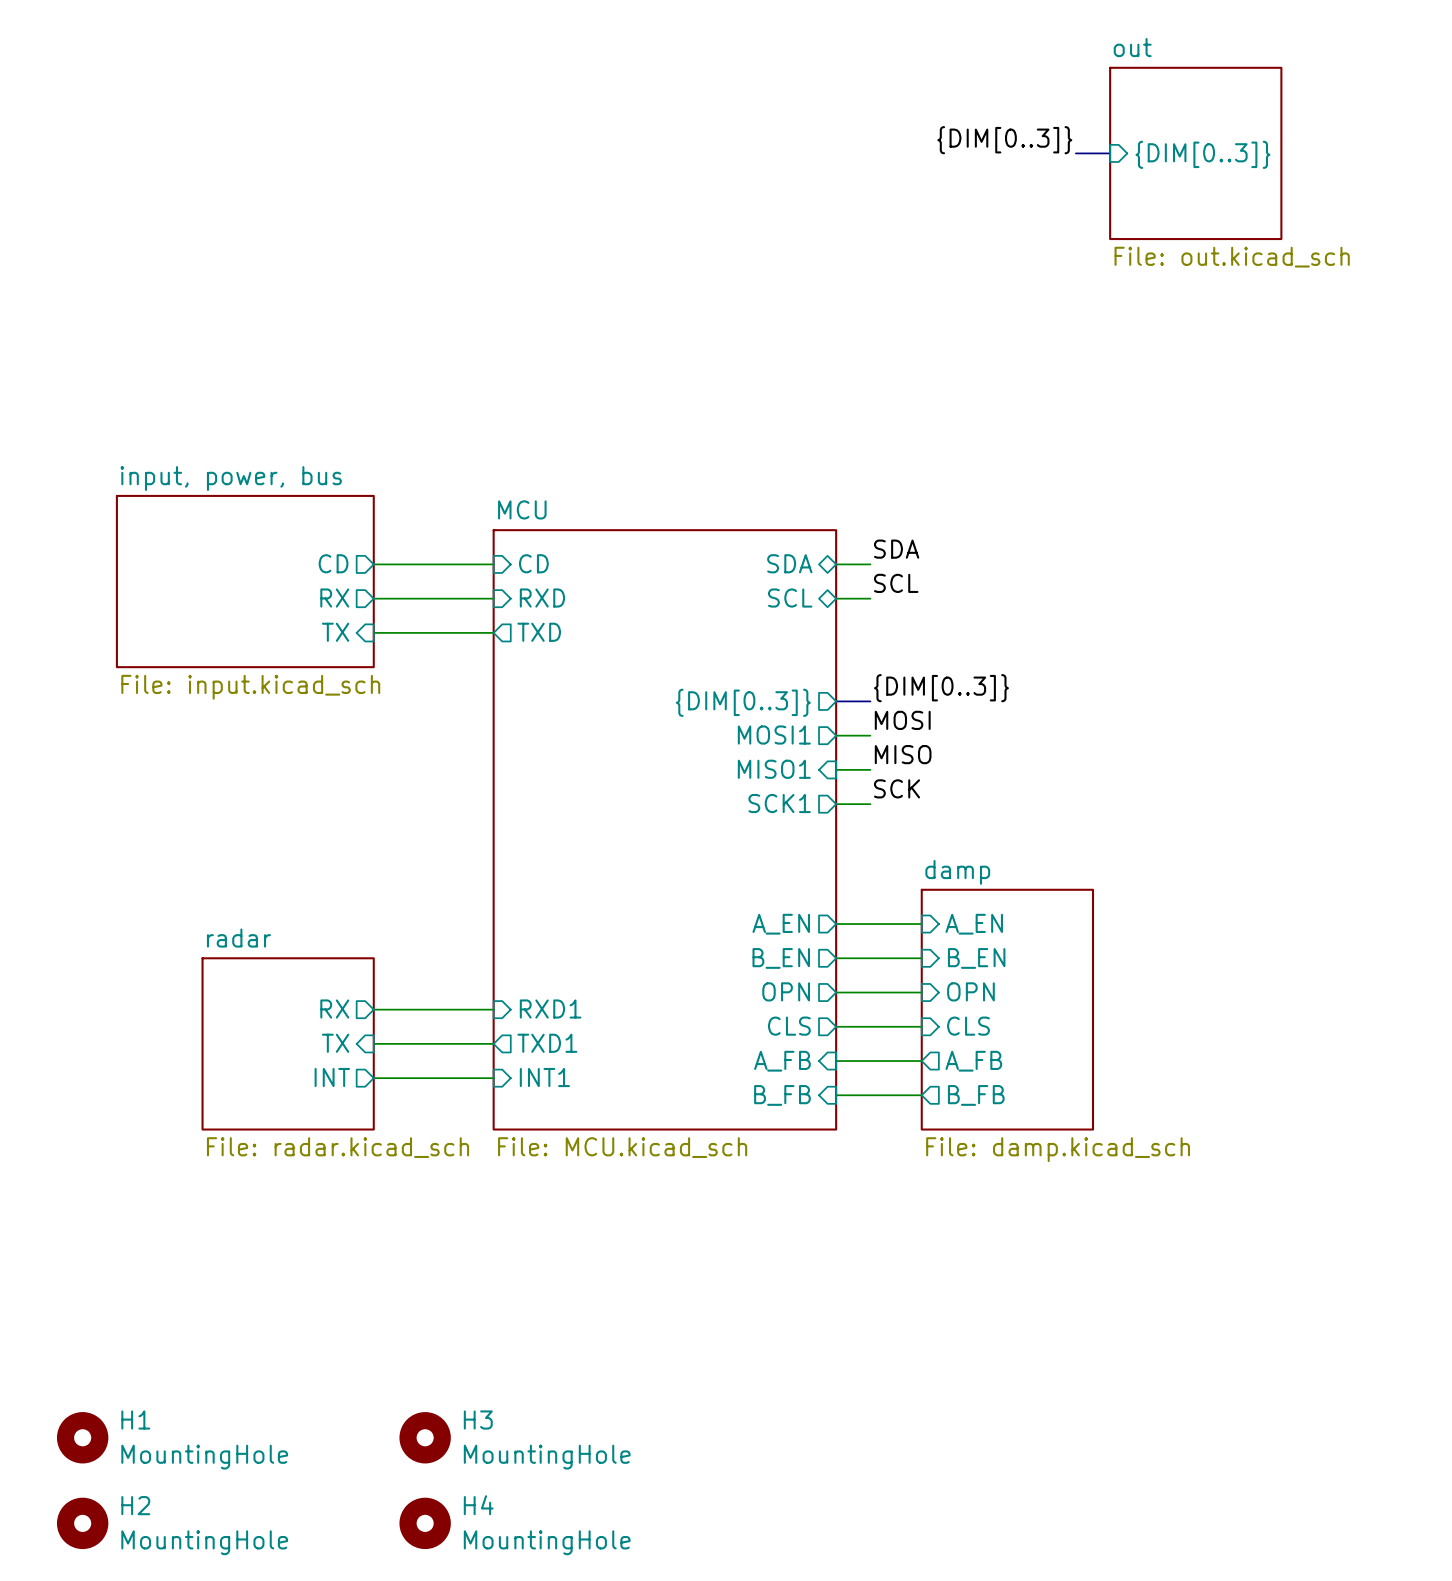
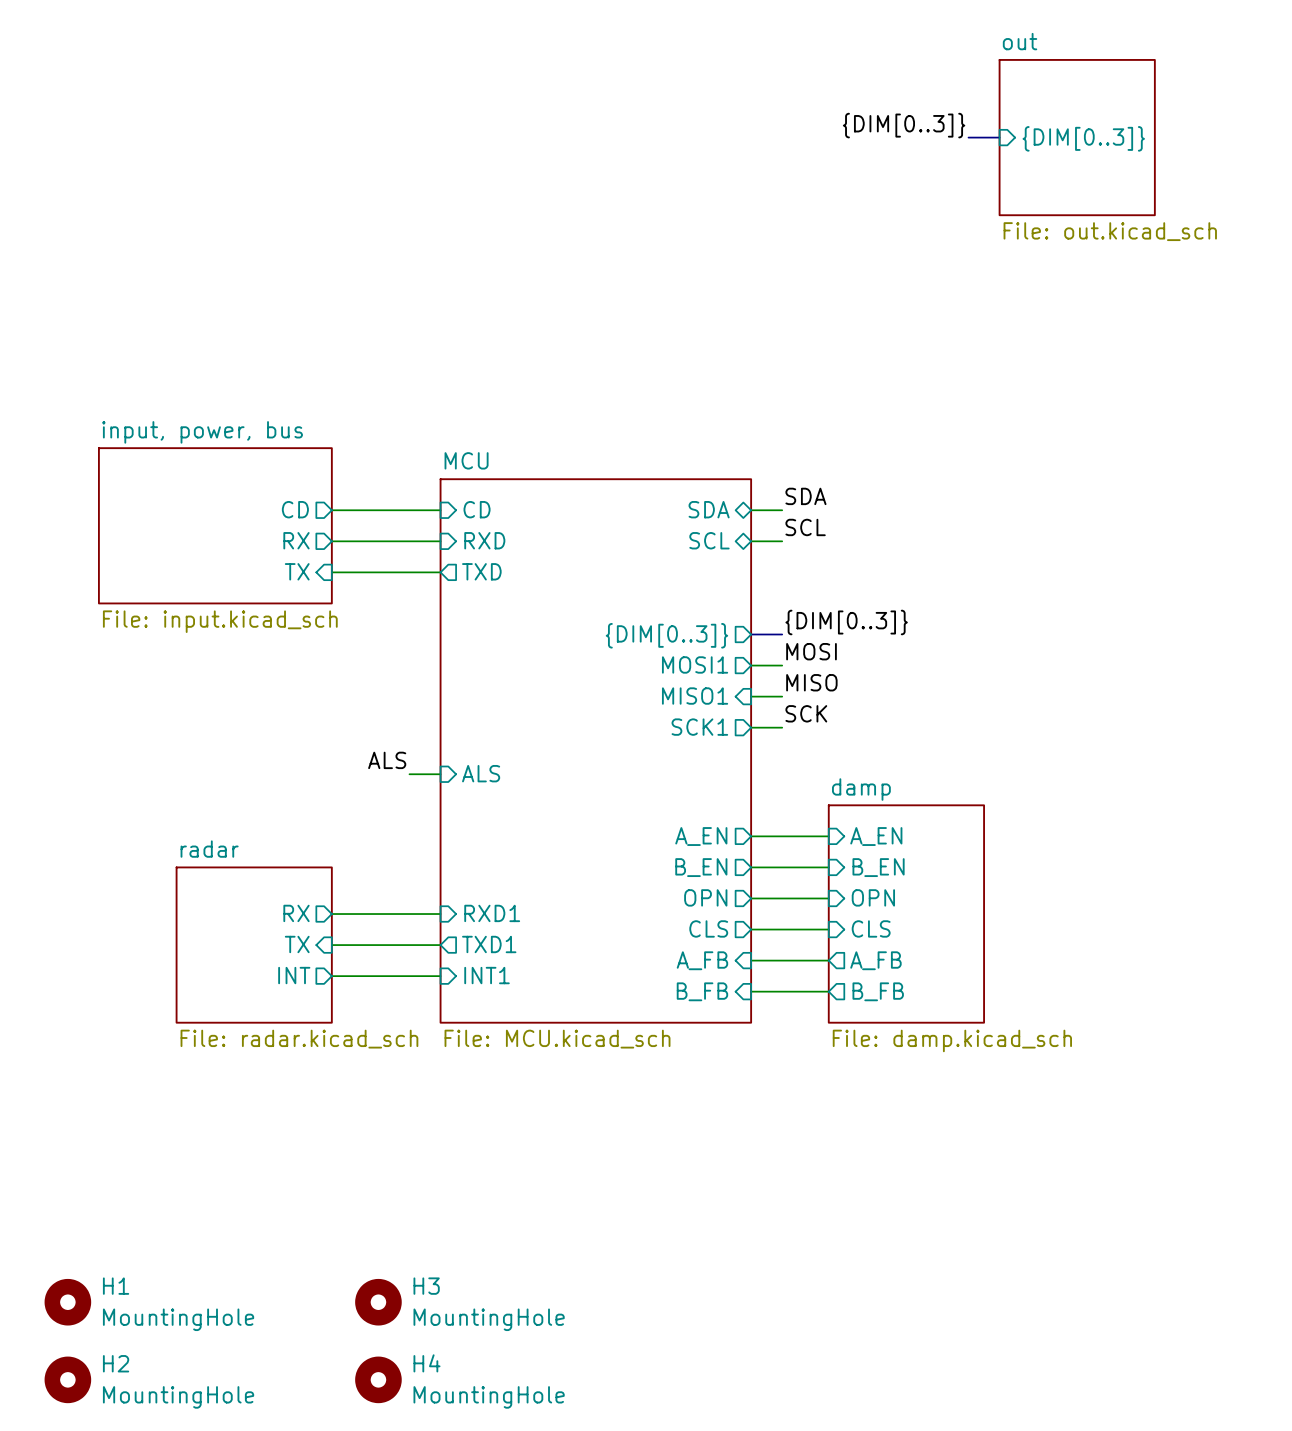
label: none -> ALS (387, 760)
sheet pin: none -> ALS (481, 773)
wire: none -> (409, 774) (440, 774)

